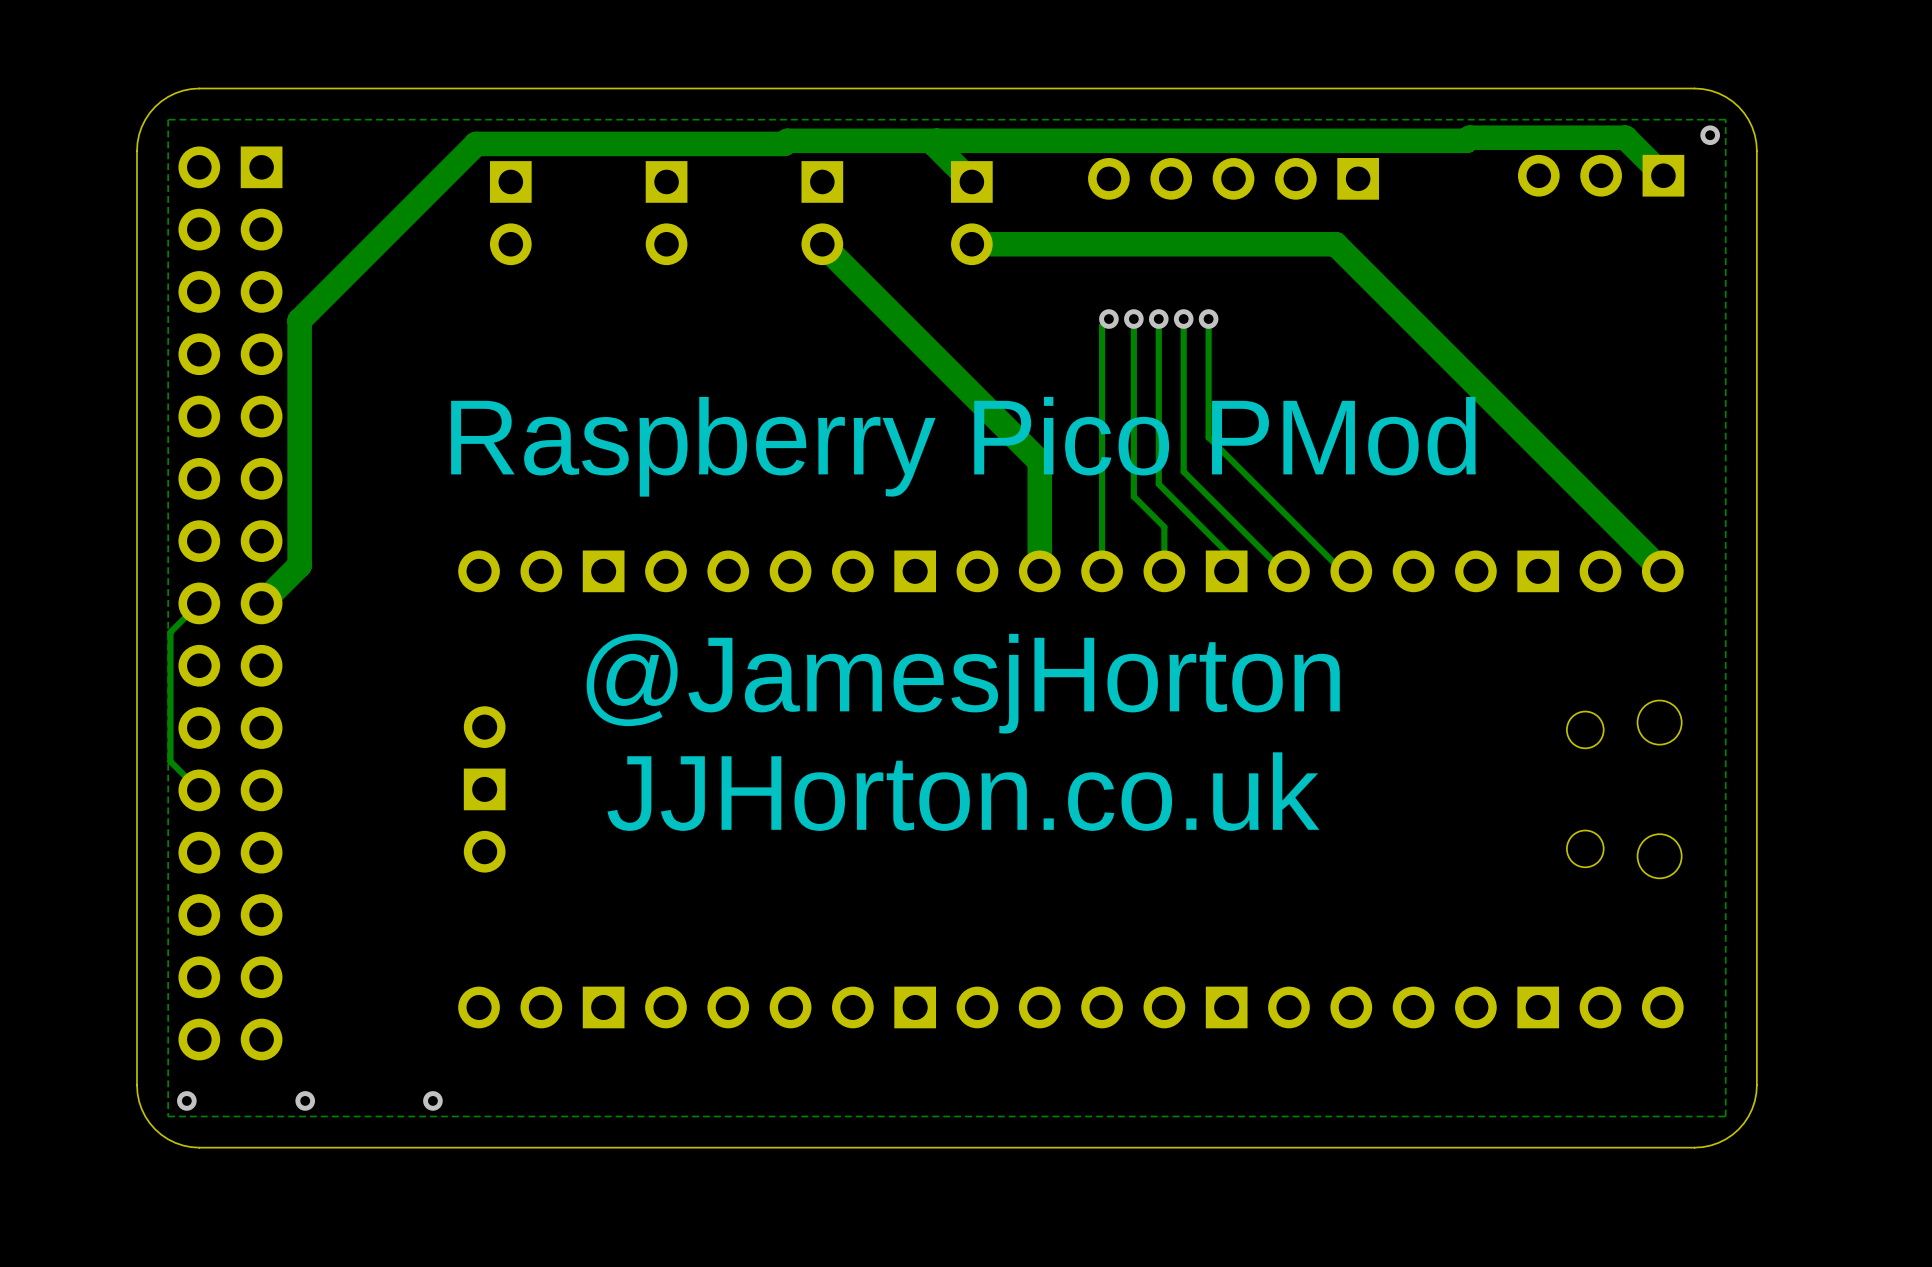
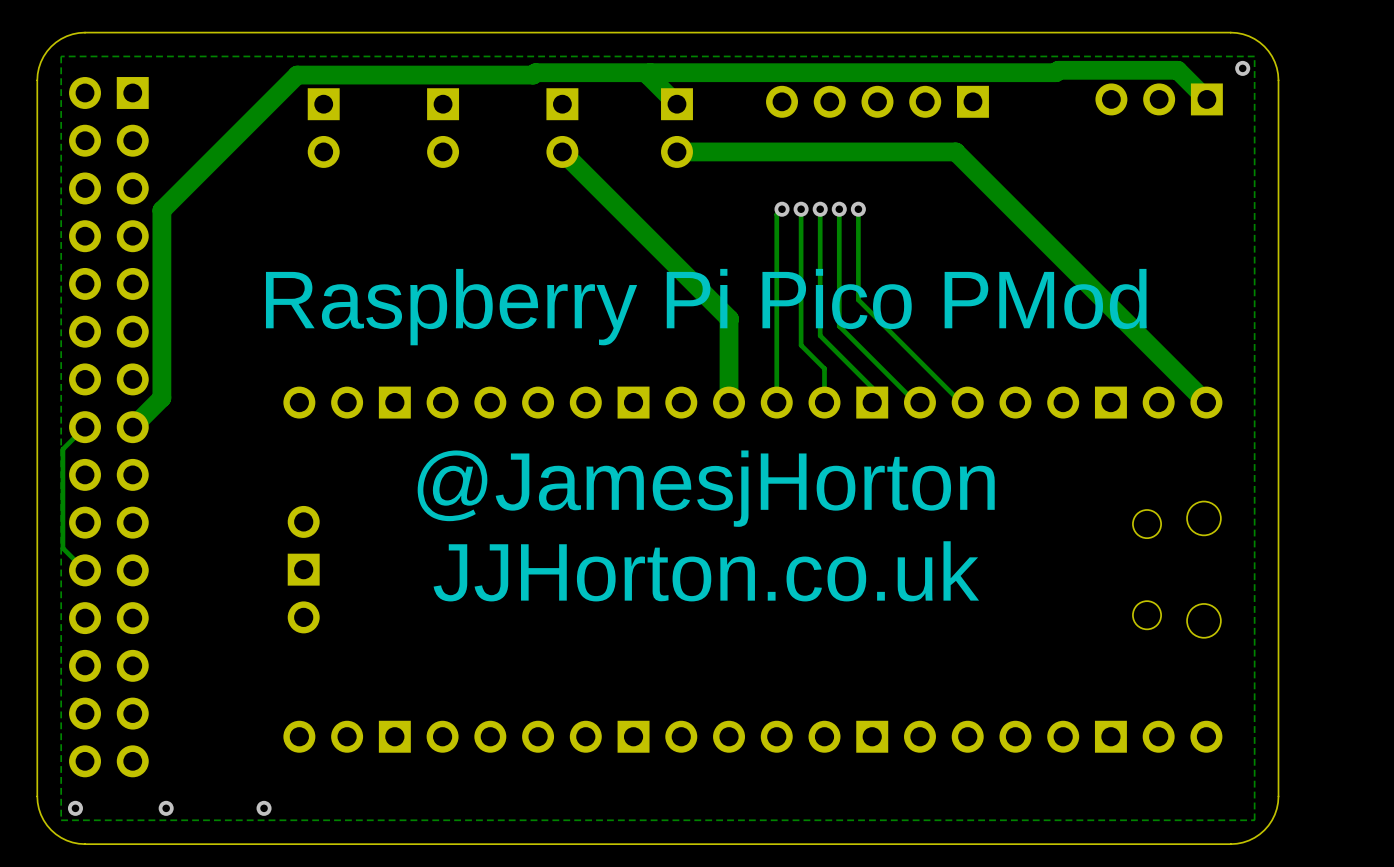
text: Raspberry Pico PMod (963, 446) -> Raspberry Pi Pico PMod (706, 307)
text position: @JamesjHorton (963, 683) -> @JamesjHorton (706, 488)
text position: JJHorton.co.uk (963, 791) -> JJHorton.co.uk (706, 571)

